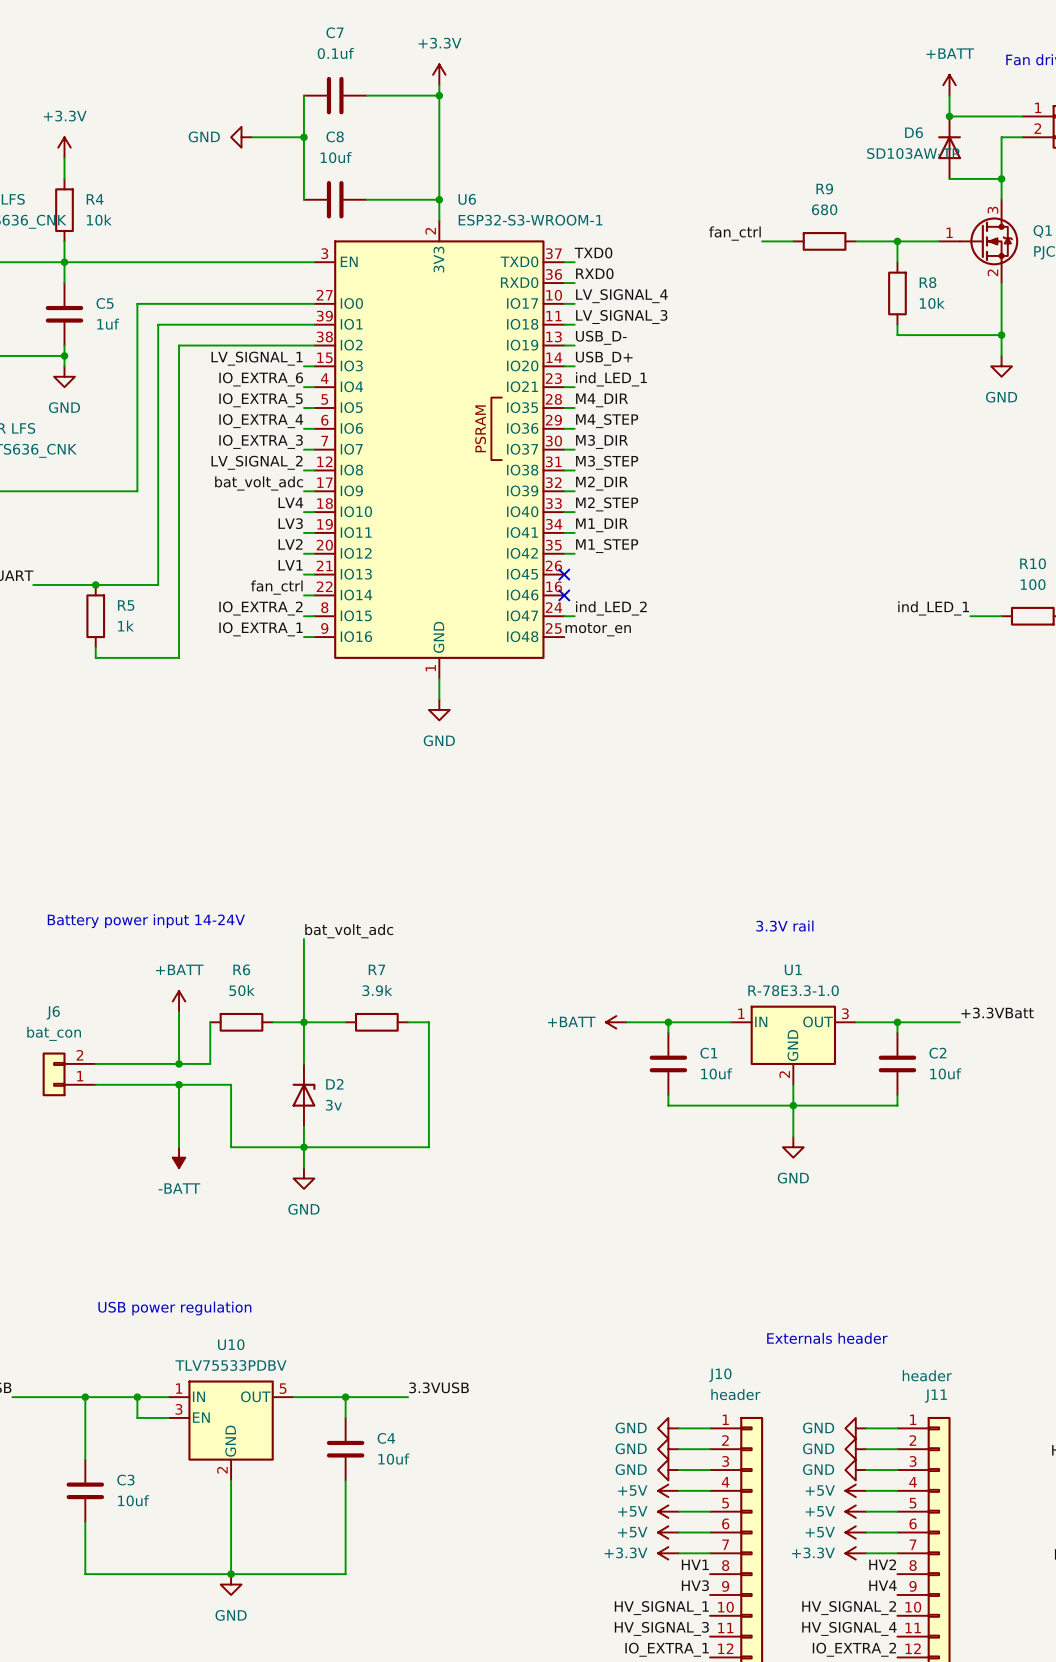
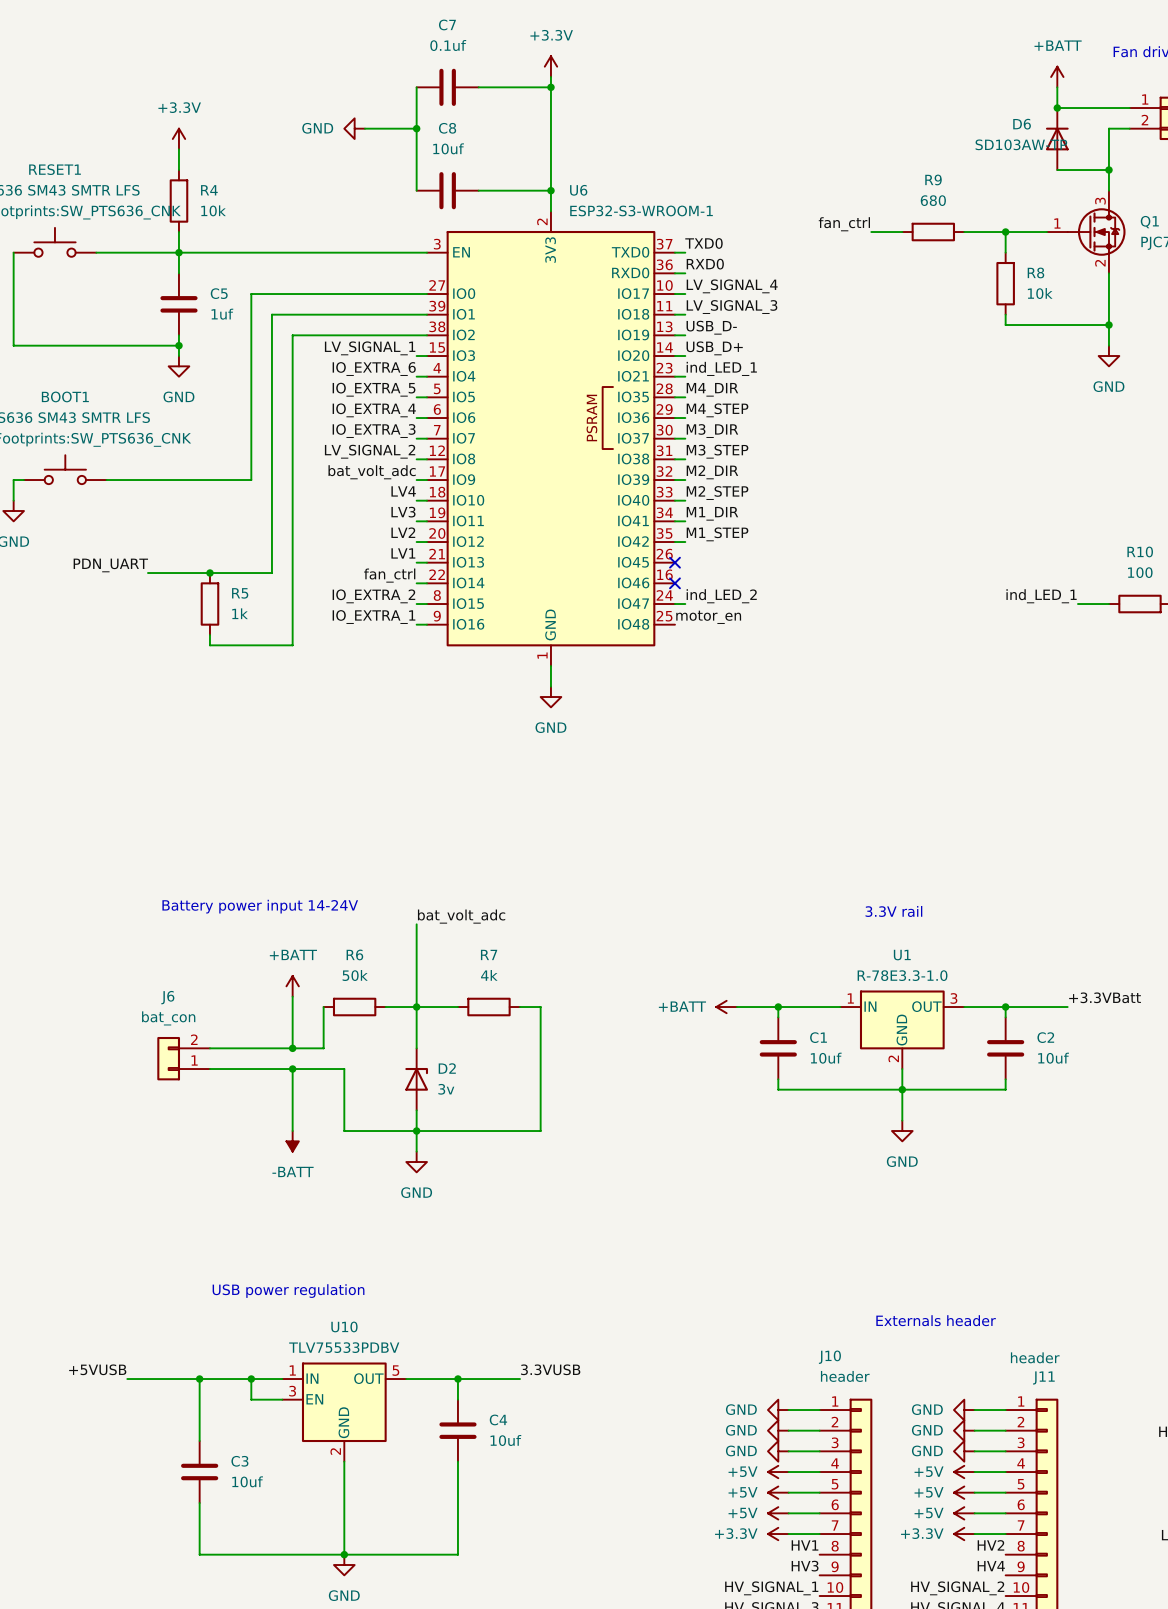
R7 value: 3.9k (377, 990) -> 4k (489, 975)

